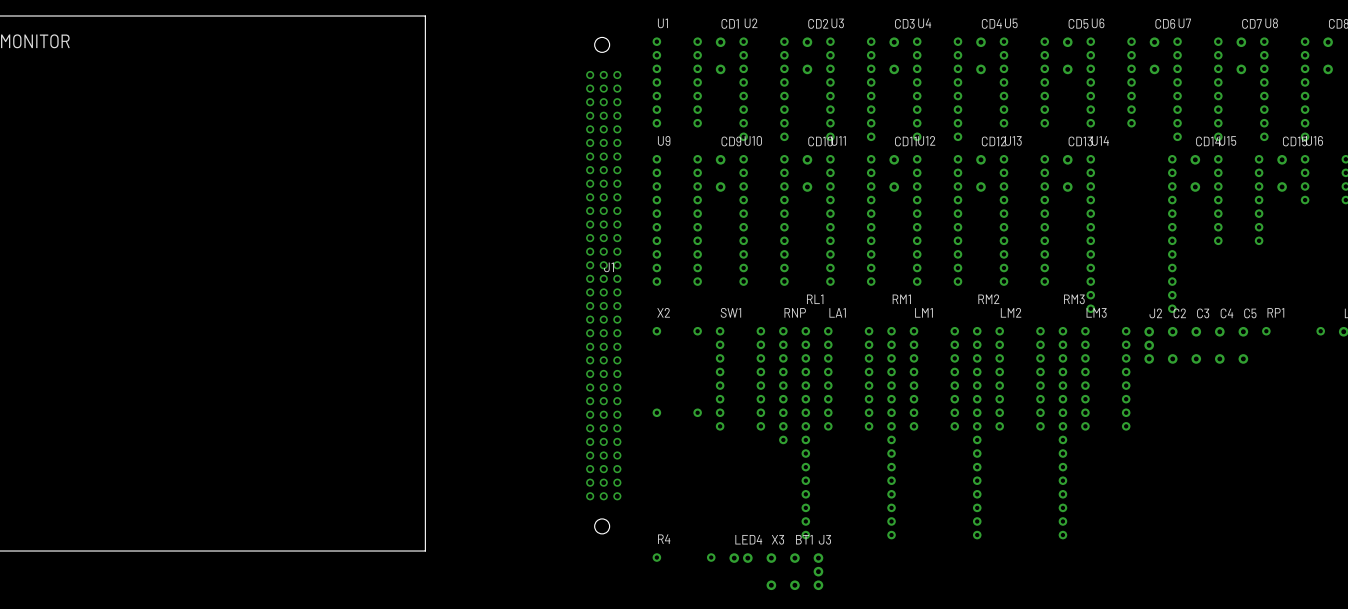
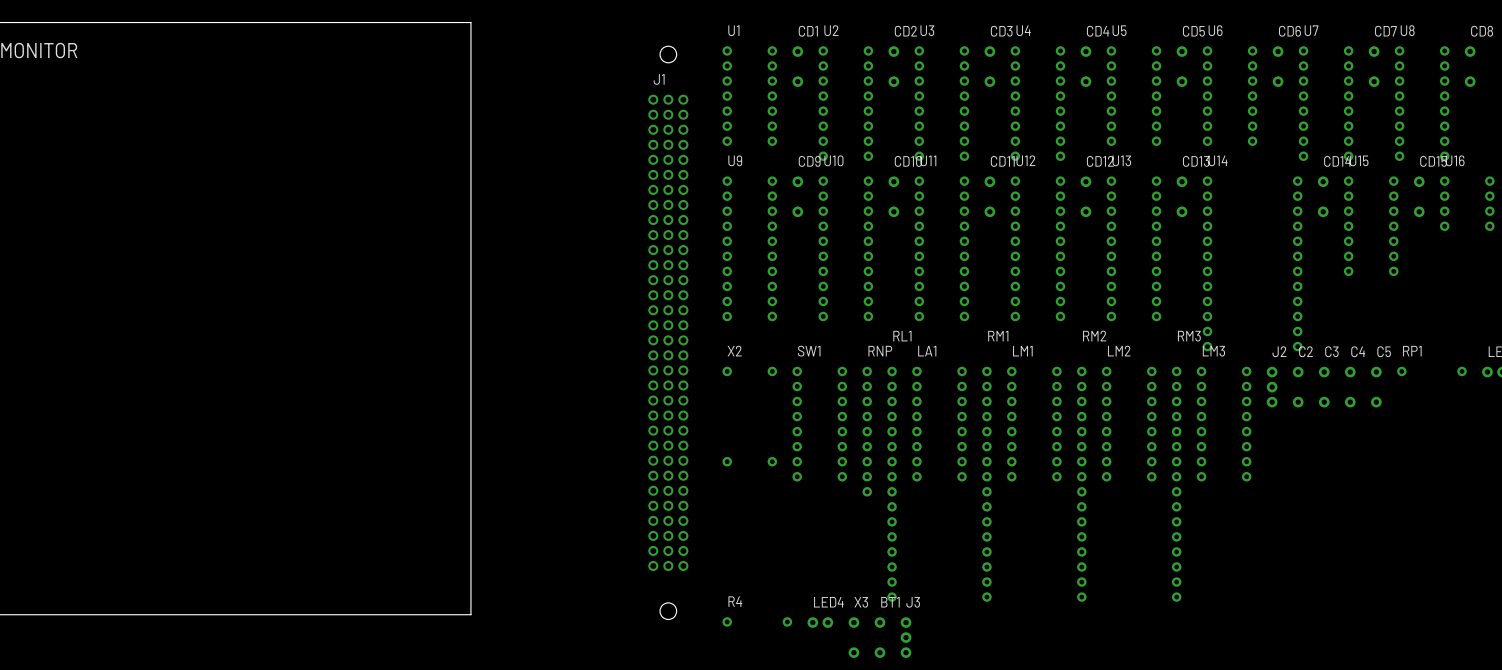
J1 footprint: [586, 37, 622, 534] -> [648, 46, 689, 620]
J1 name position: J1 (609, 267) -> J1 (659, 79)

